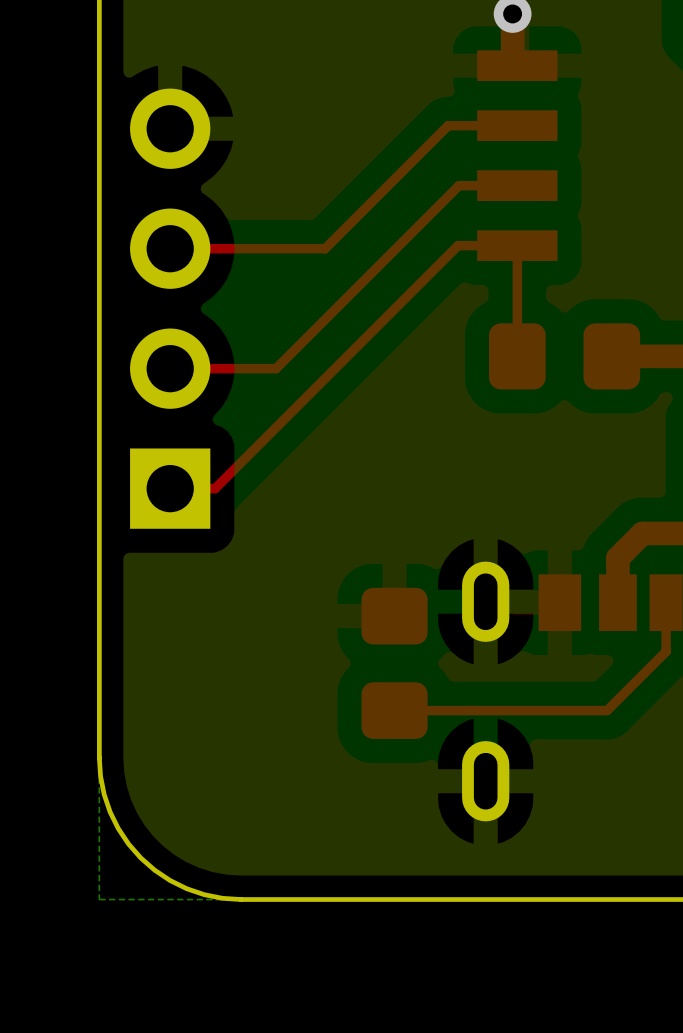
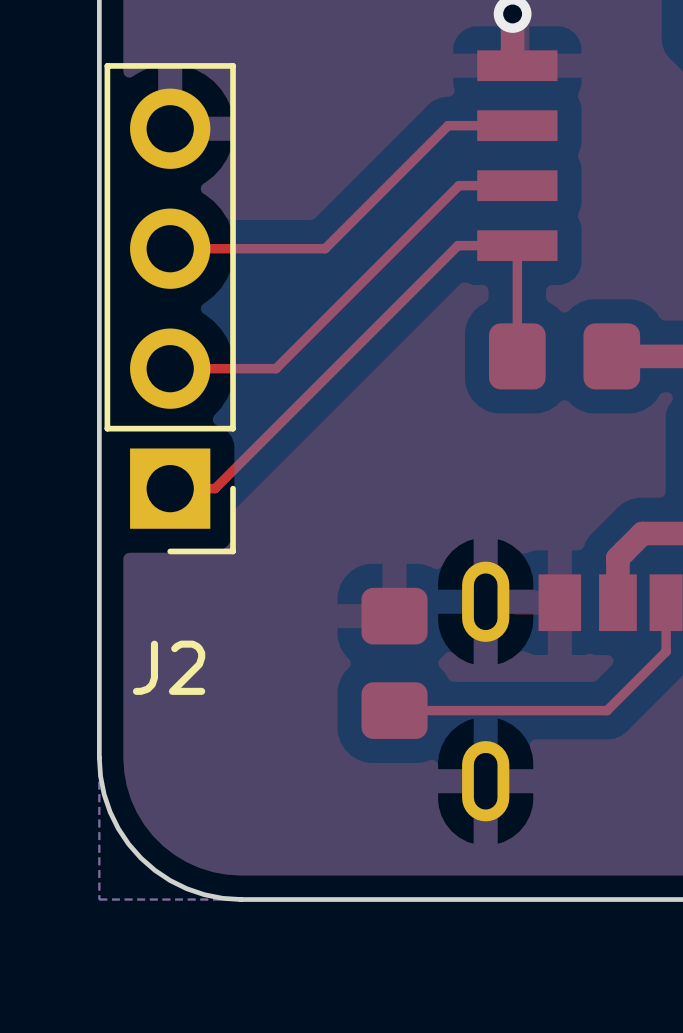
J2: none -> (170, 308)

